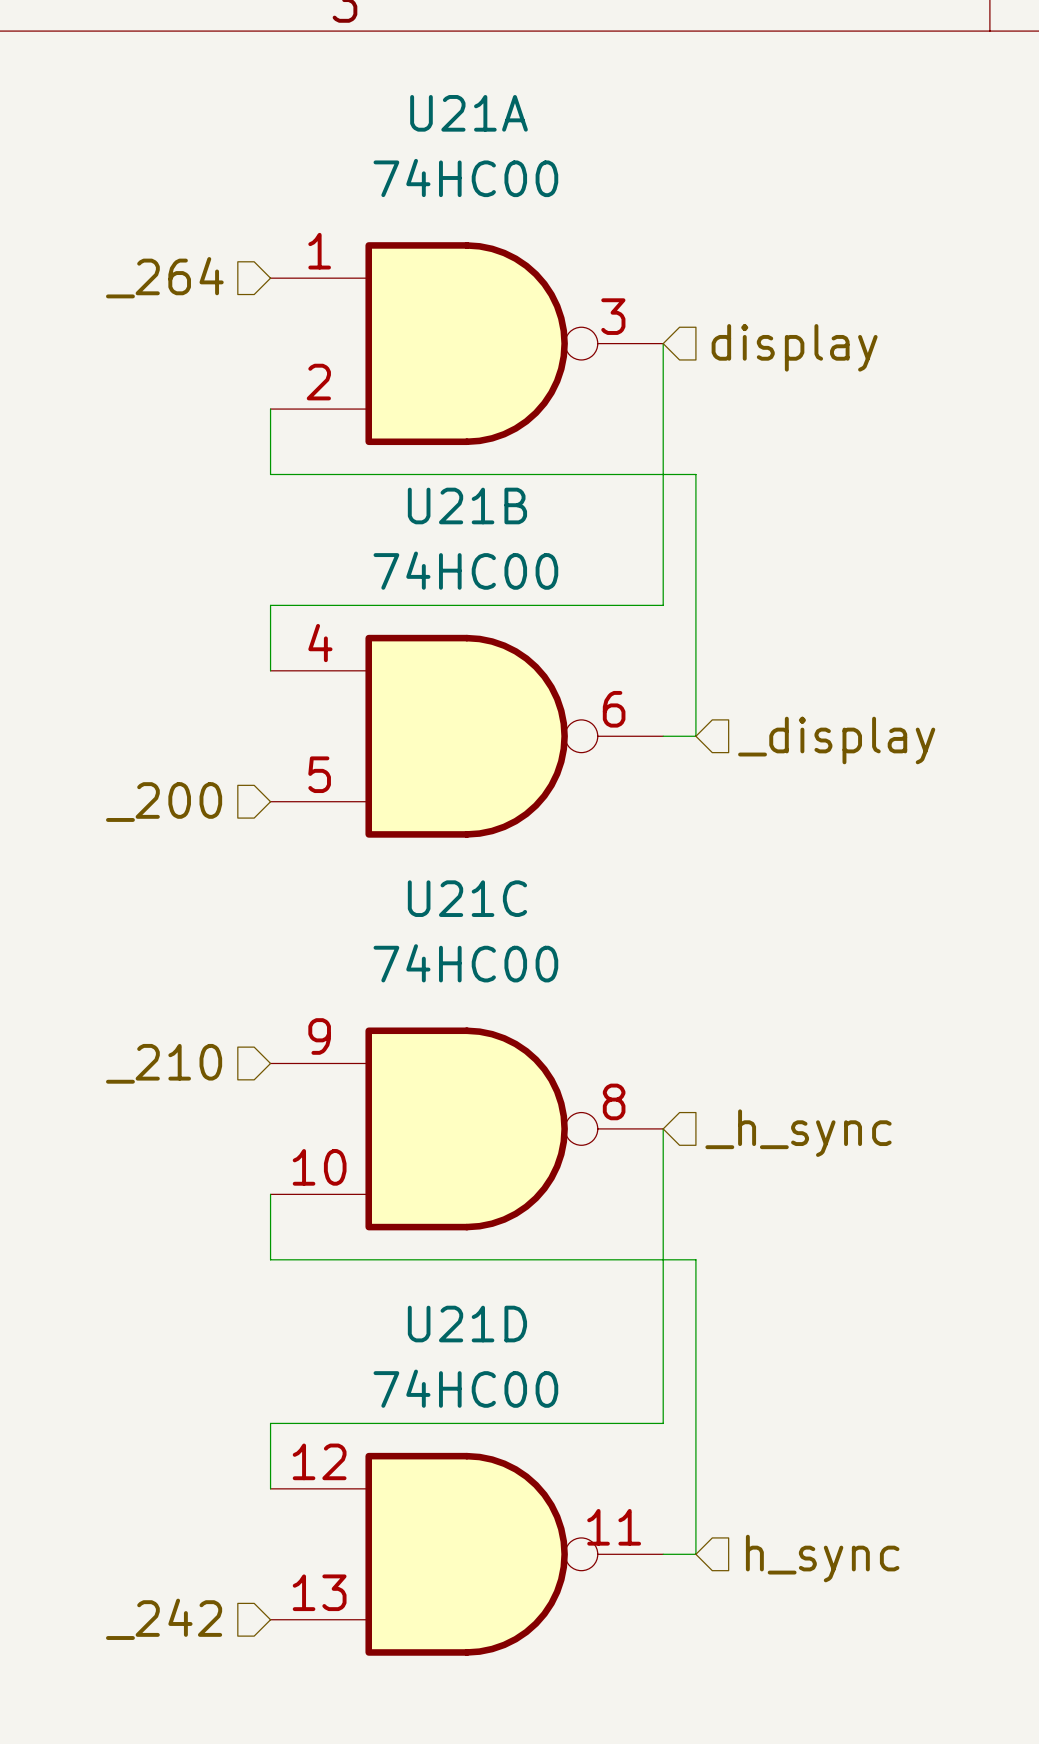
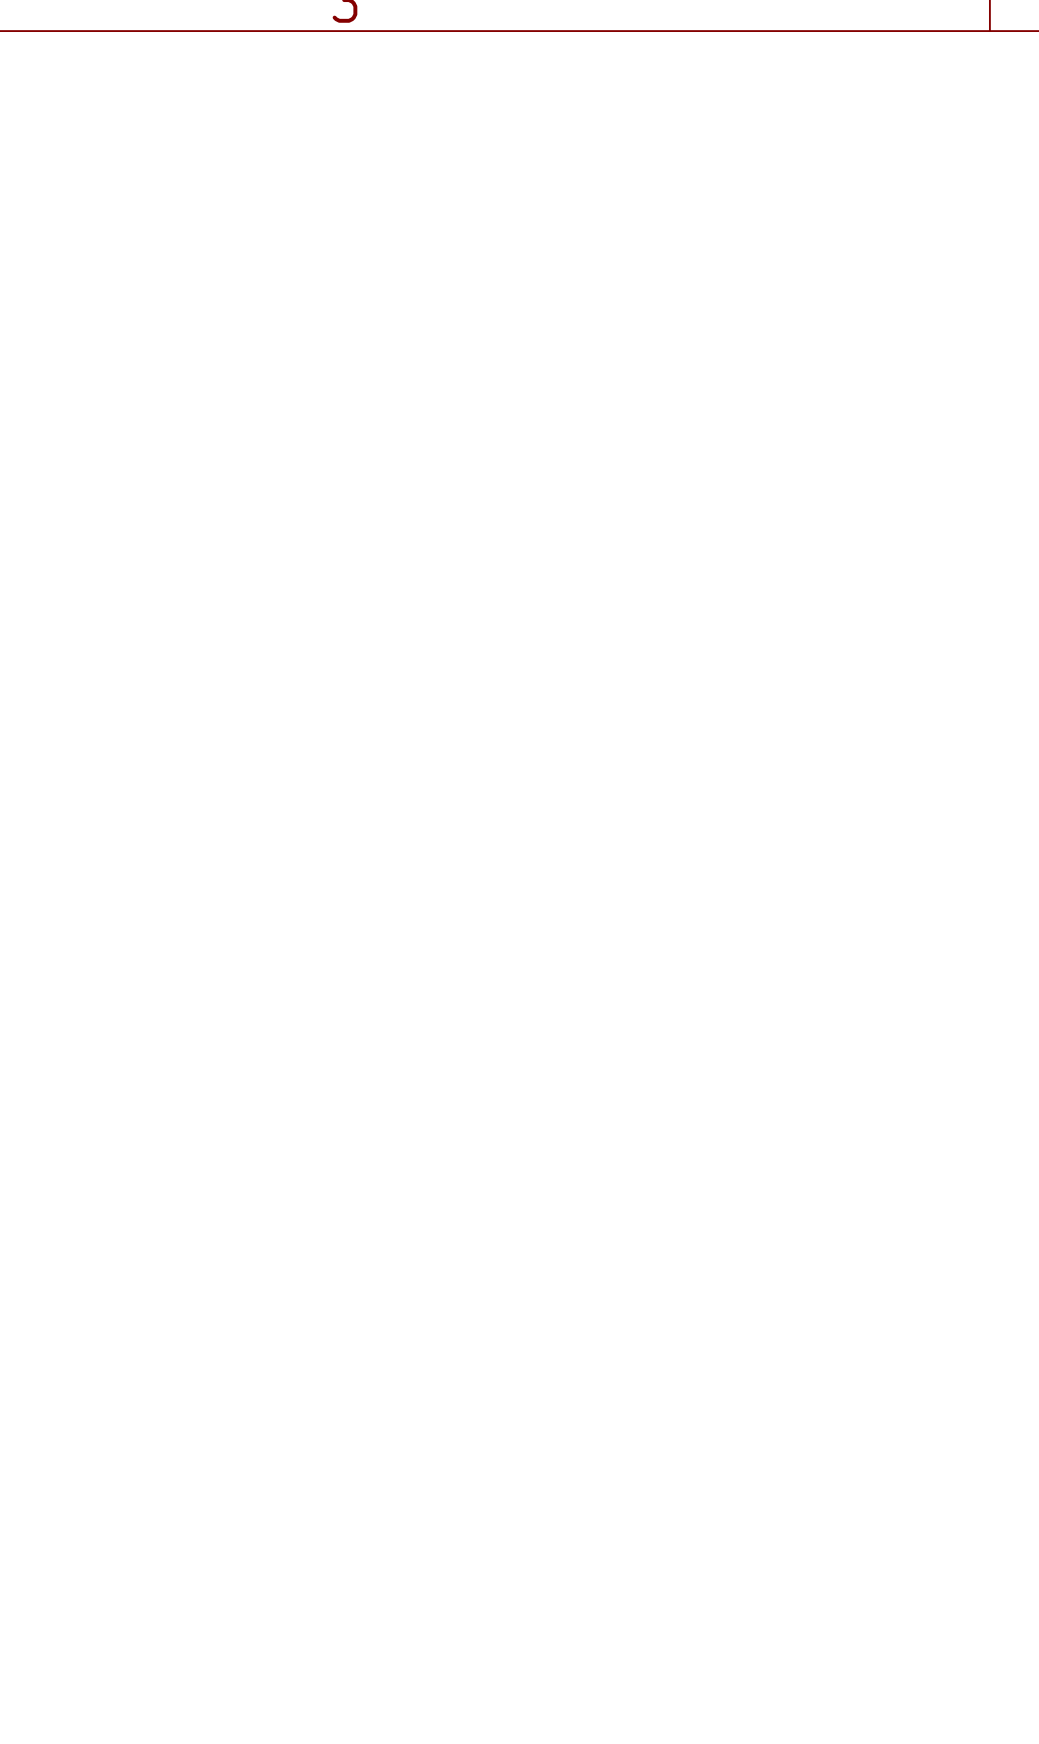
hierarchical label: _264 (164, 277) -> none
U21A: 74HC00 (466, 343) -> none
wire: (663, 343) (663, 605) (270, 605) (270, 670) -> none
hierarchical label: display (794, 347) -> none
wire: (270, 409) (270, 474) (695, 474) (695, 736) (663, 736) -> none
U21B: 74HC00 (466, 736) -> none
hierarchical label: _display (836, 740) -> none
hierarchical label: _200 (164, 802) -> none
hierarchical label: _210 (164, 1063) -> none
U21C: 74HC00 (466, 1128) -> none
wire: (663, 1128) (663, 1423) (270, 1423) (270, 1488) -> none
hierarchical label: _h_sync (798, 1133) -> none
wire: (270, 1194) (270, 1259) (695, 1259) (695, 1554) (663, 1554) -> none
U21D: 74HC00 (466, 1554) -> none
hierarchical label: h_sync (822, 1558) -> none
hierarchical label: _242 (164, 1619) -> none

